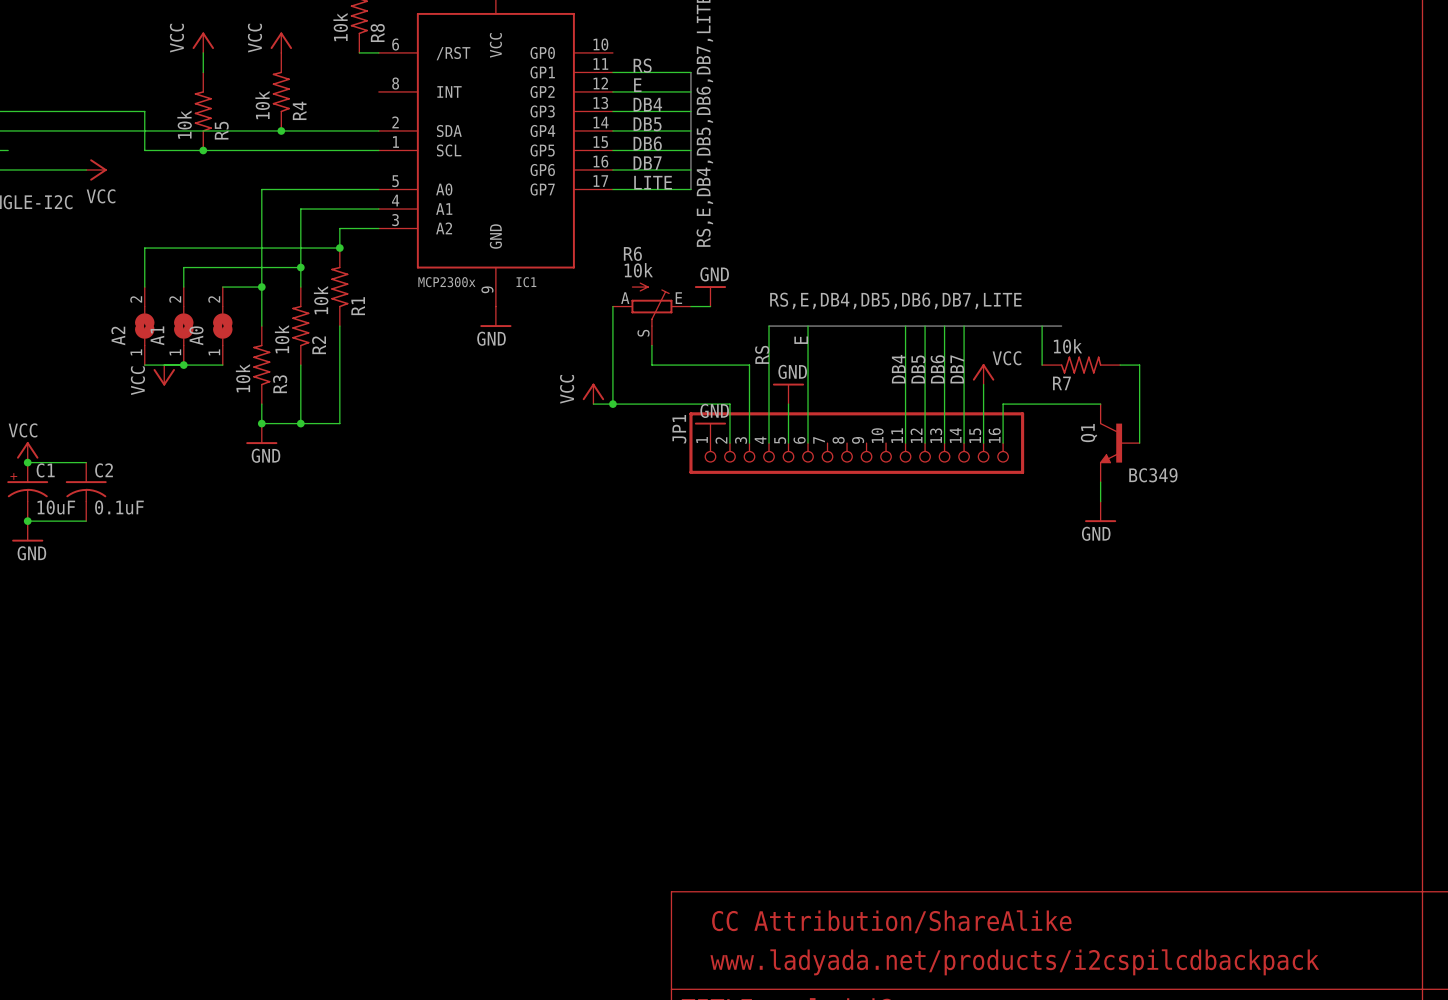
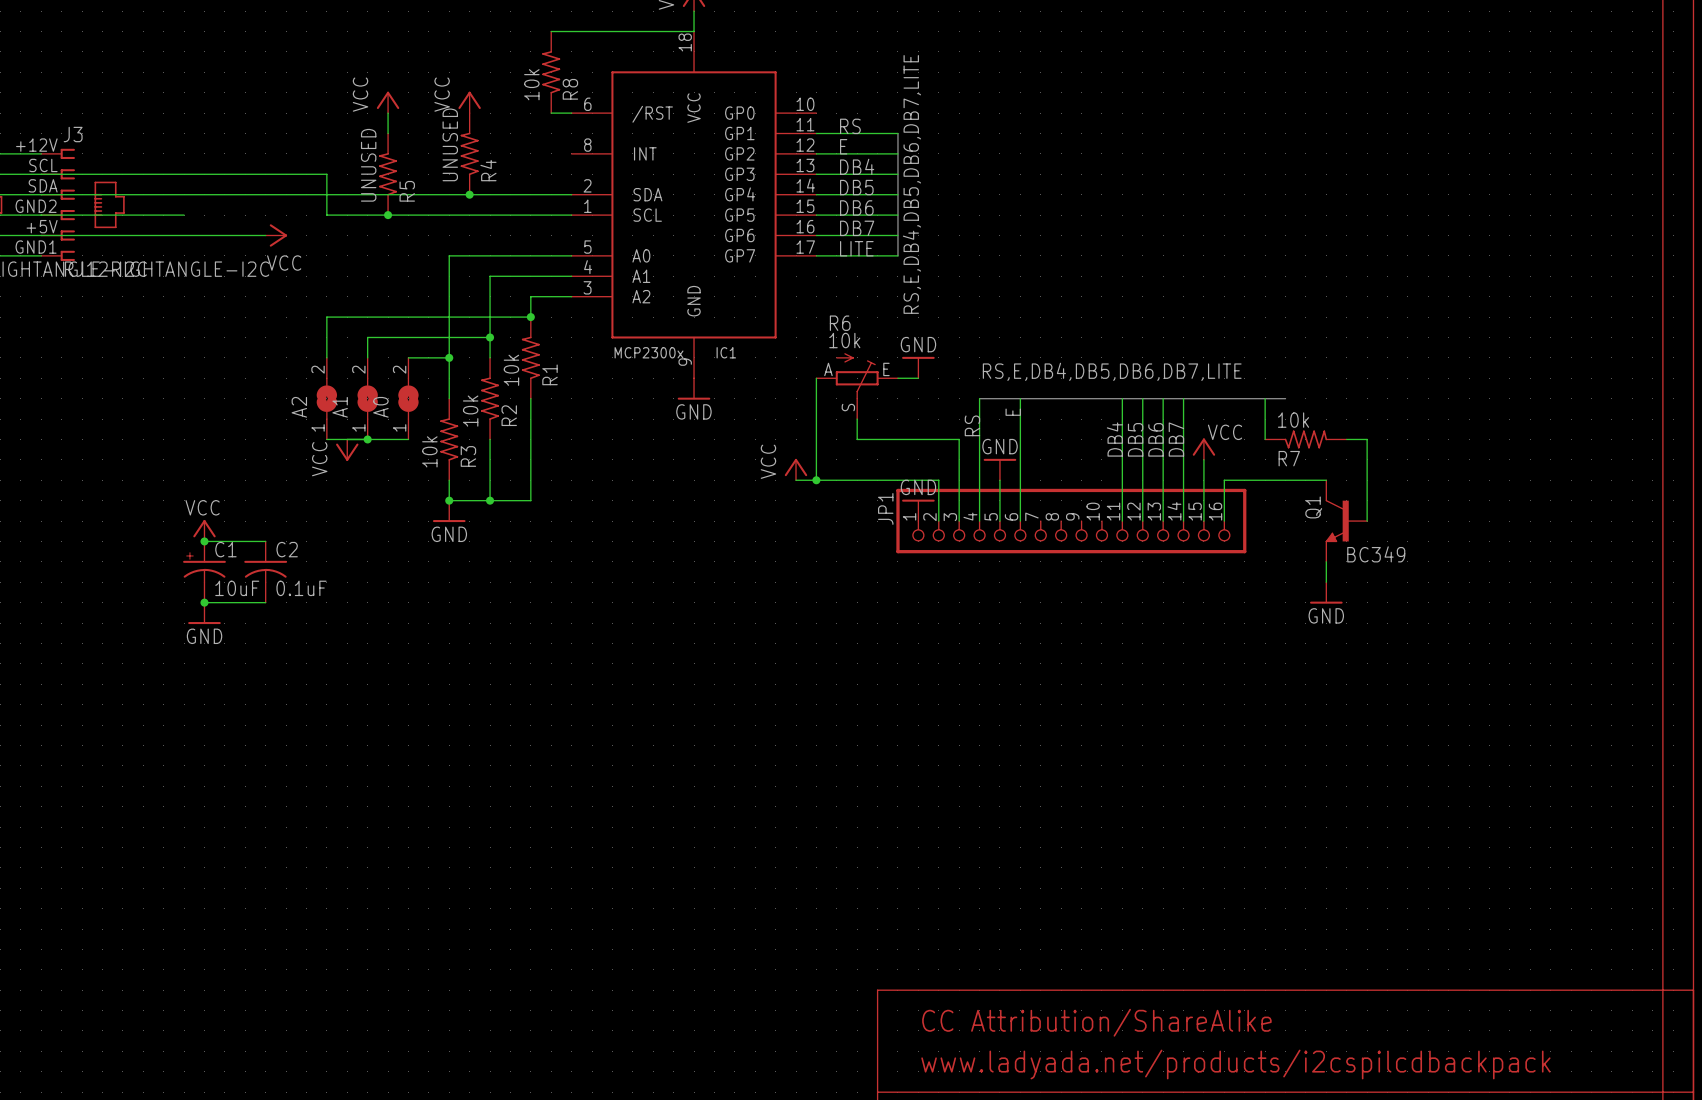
R4 value: 10k (262, 105) -> UNUSED (450, 144)
R5 value: 10k (184, 124) -> UNUSED (368, 165)

